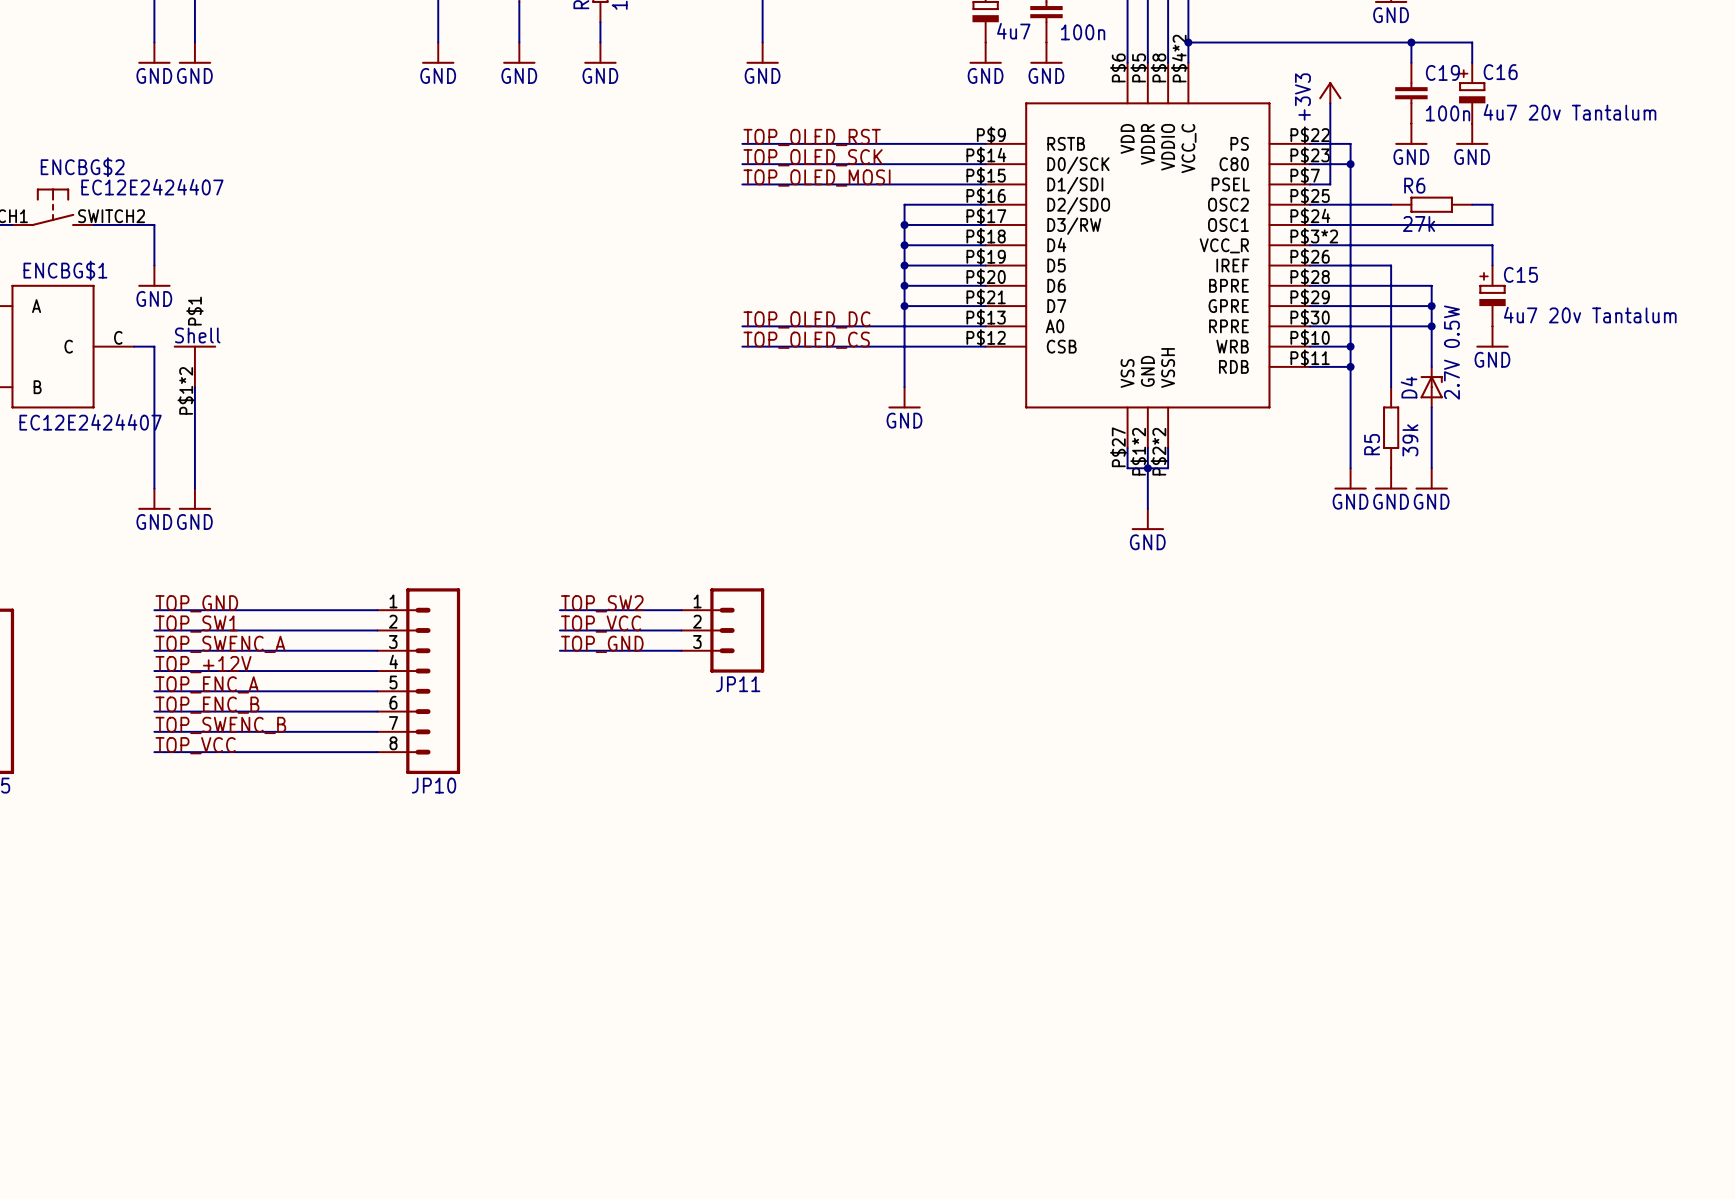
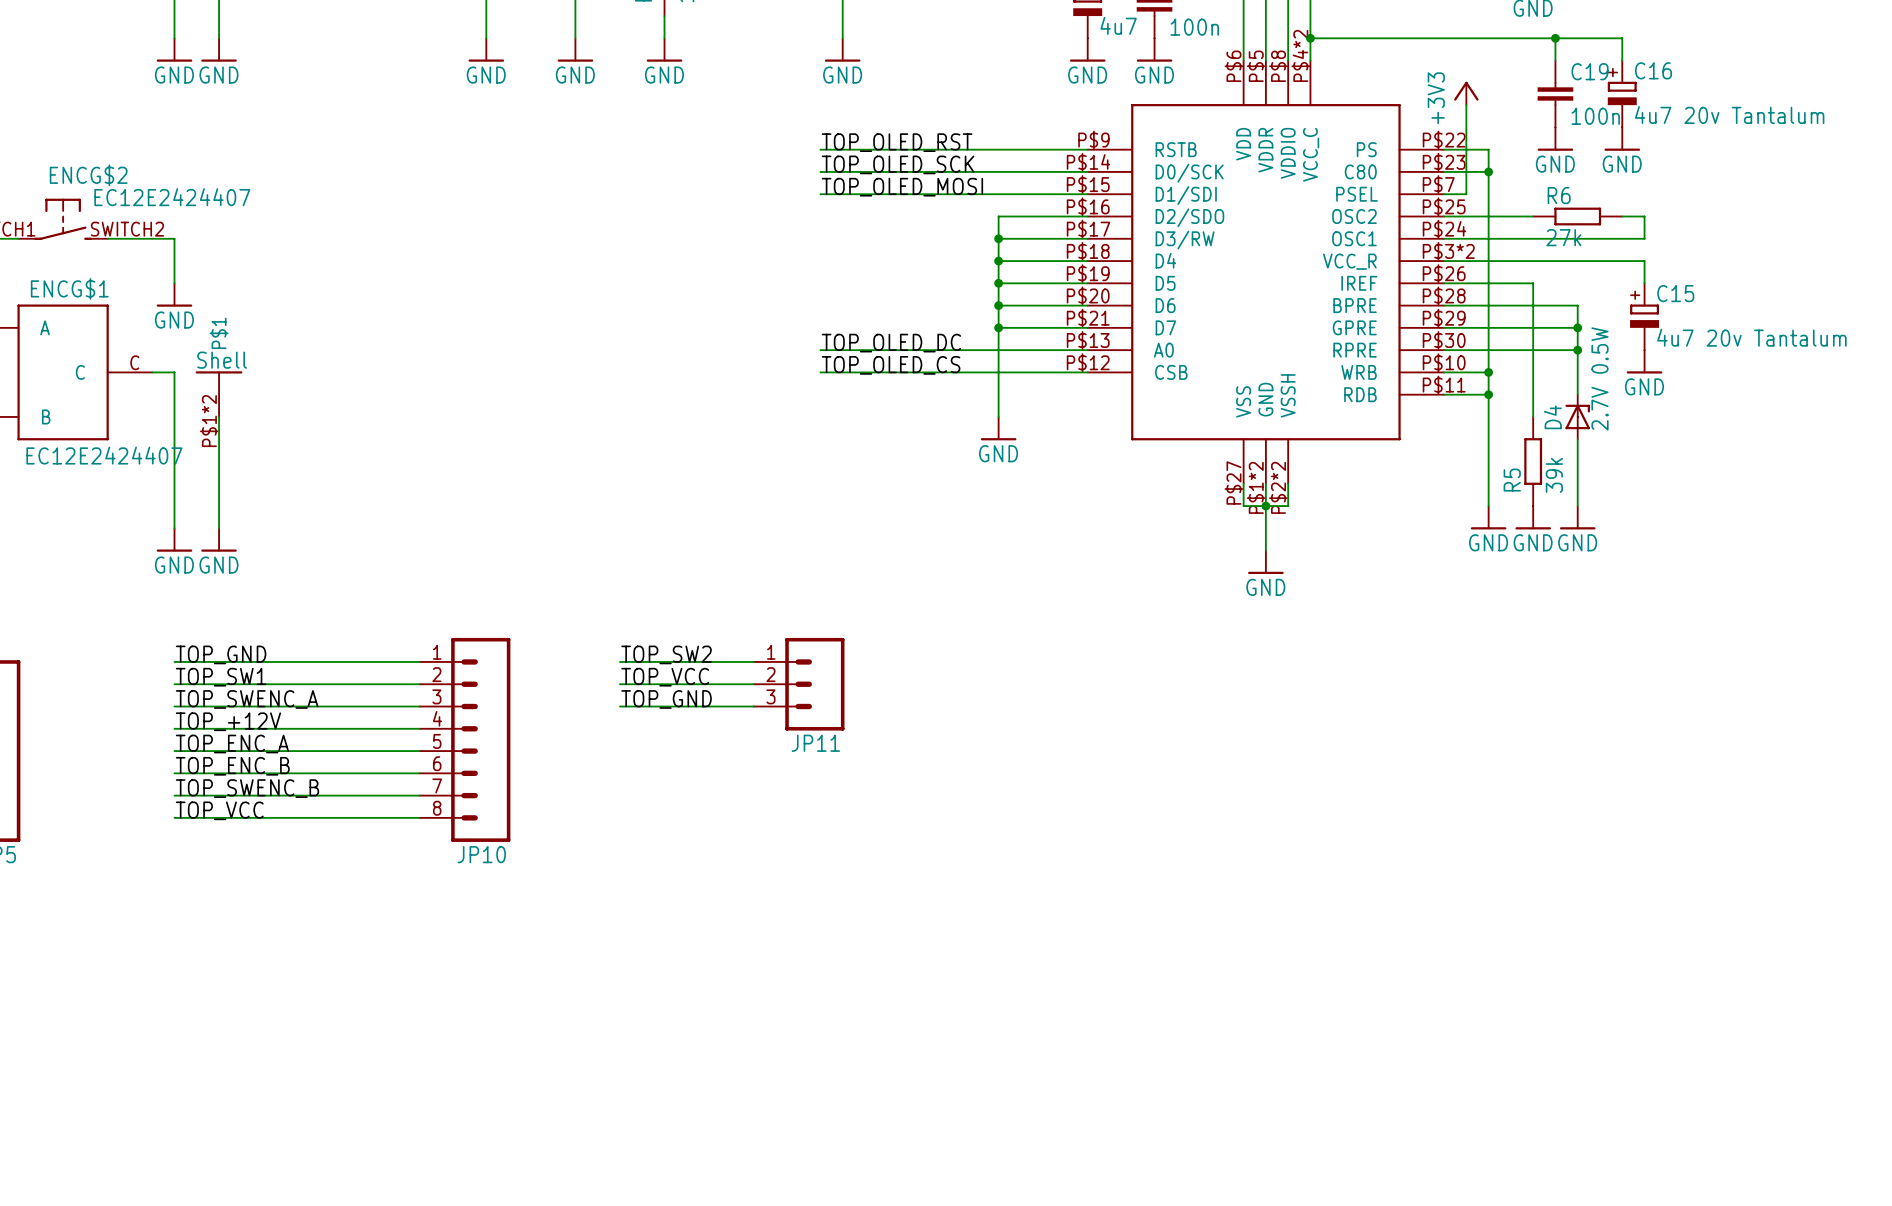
ENCBG$2 name: ENCBG$2 (82, 167) -> ENCG$2 (88, 175)
ENCBG$1 name: ENCBG$1 (65, 270) -> ENCG$1 (69, 288)

